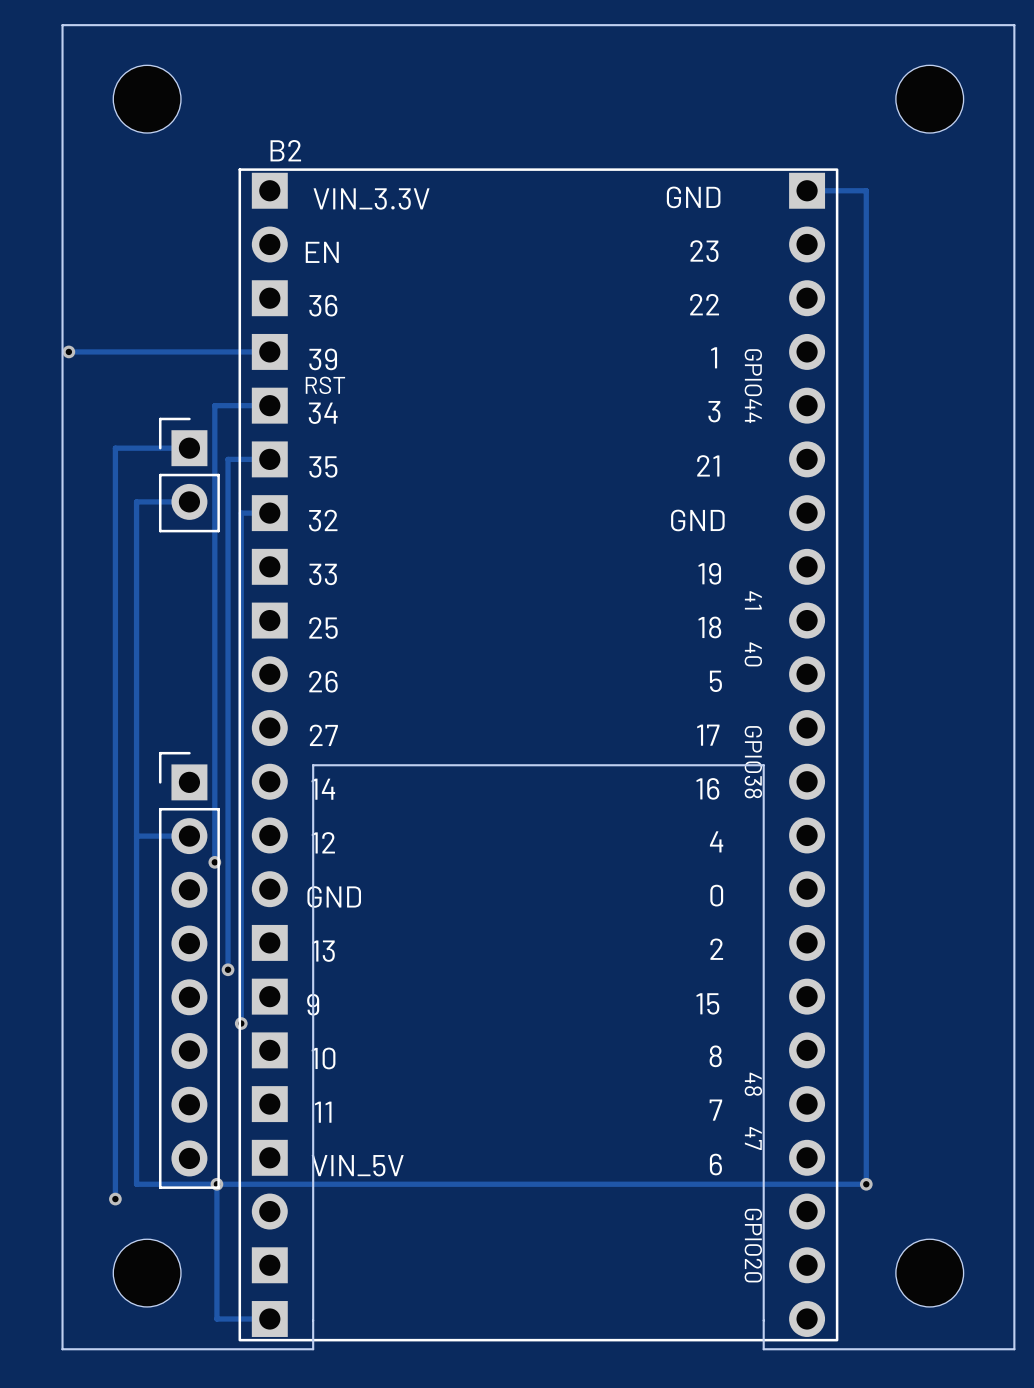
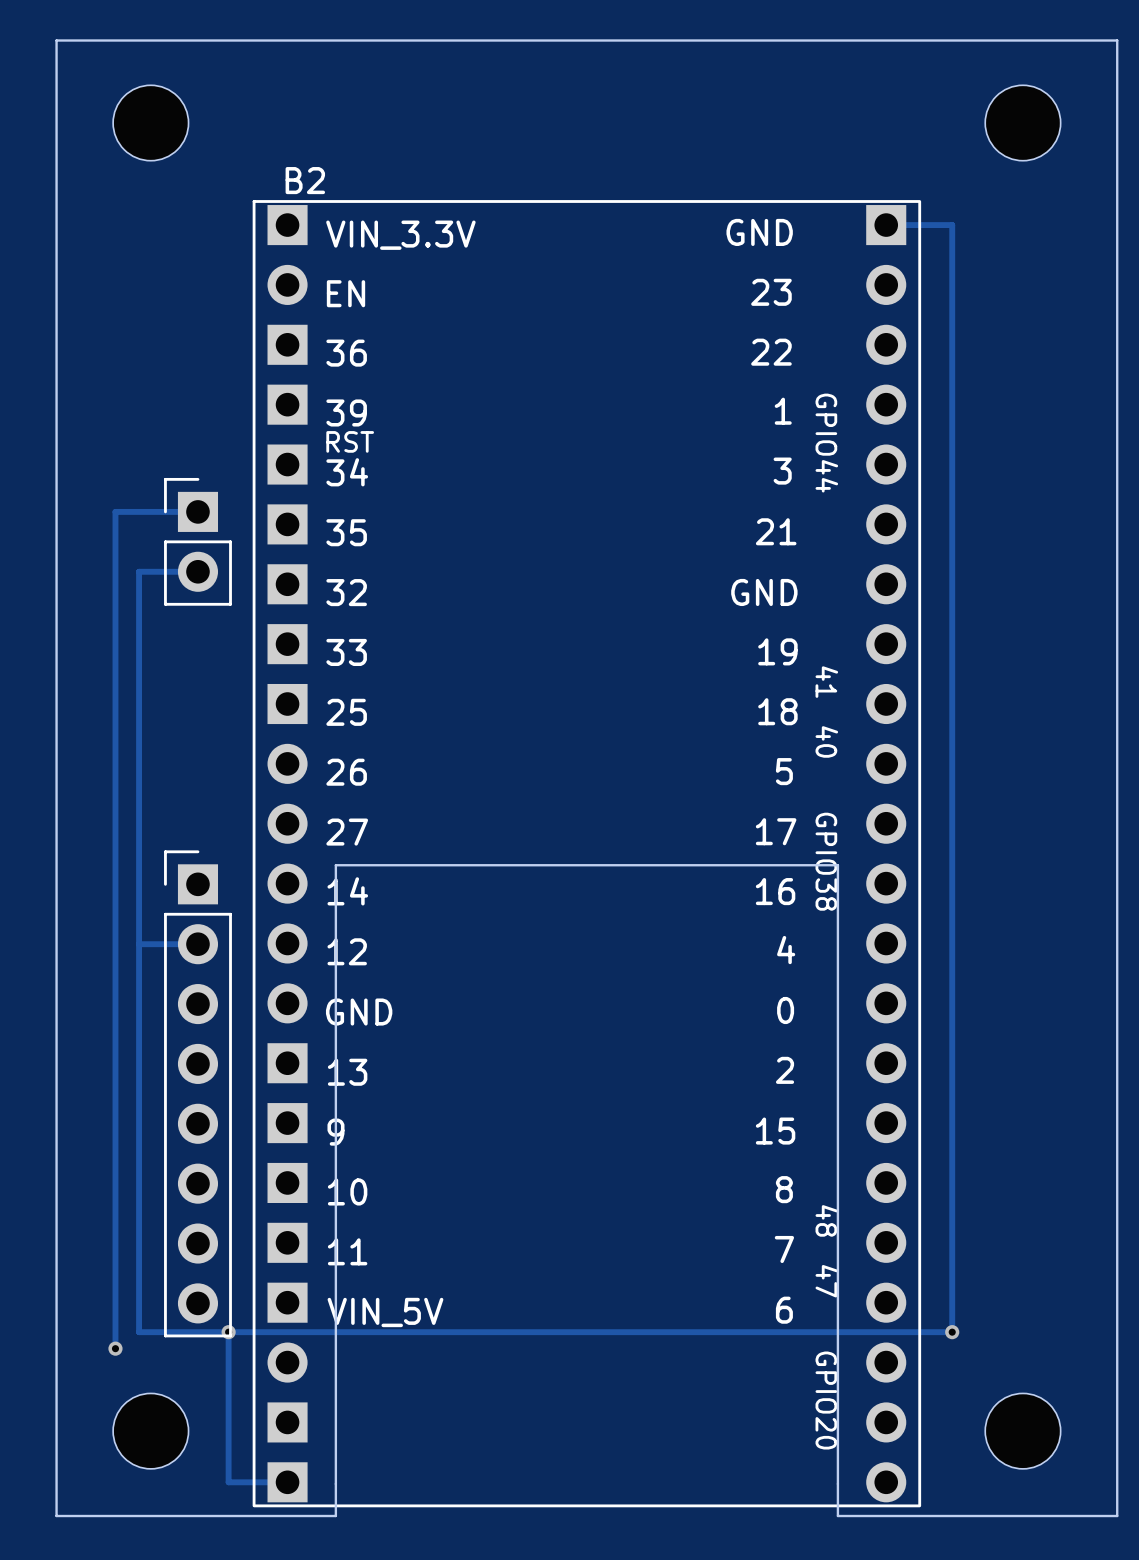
track: (68, 351) (269, 351) -> none
via: (68, 351) -> none
track: (269, 405) (214, 405) (214, 862) -> none
track: (269, 459) (228, 459) (228, 969) -> none
track: (269, 513) (241, 513) (241, 1023) -> none
via: (214, 862) -> none
via: (228, 969) -> none
via: (241, 1023) -> none

